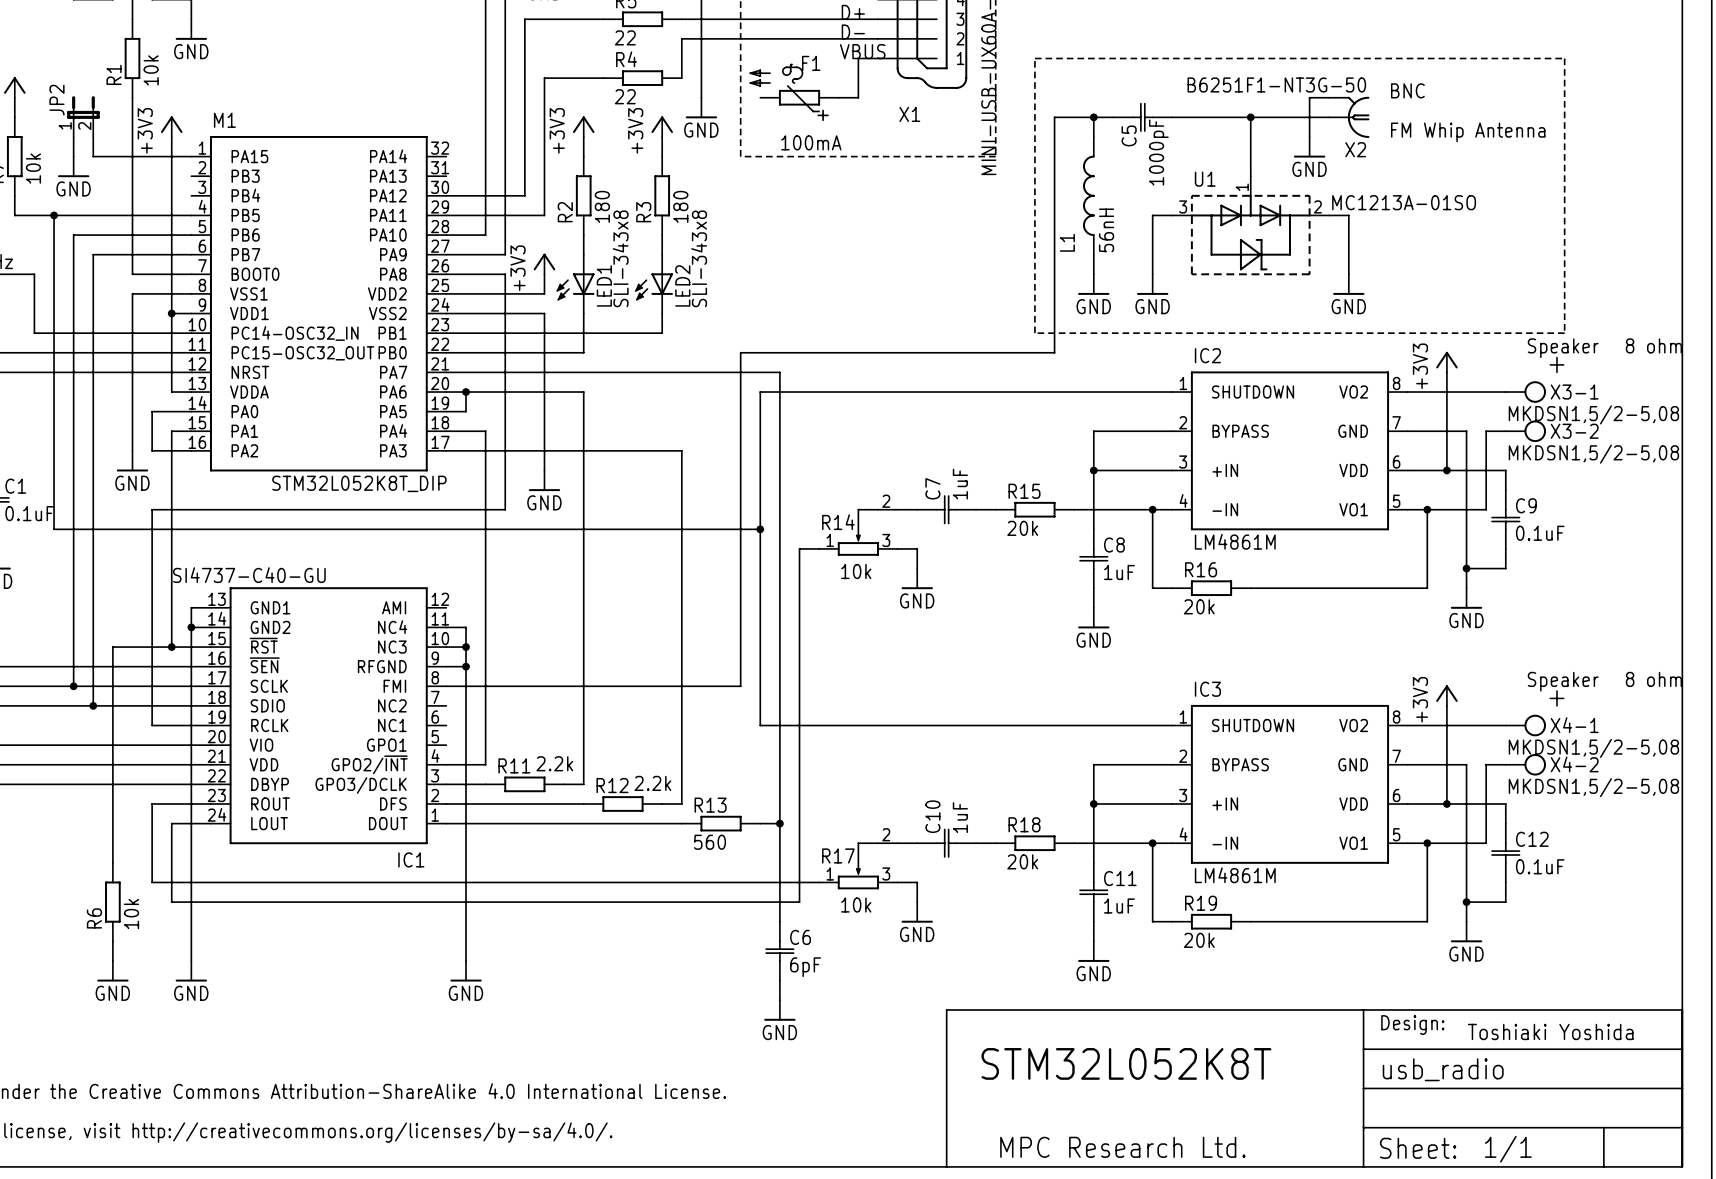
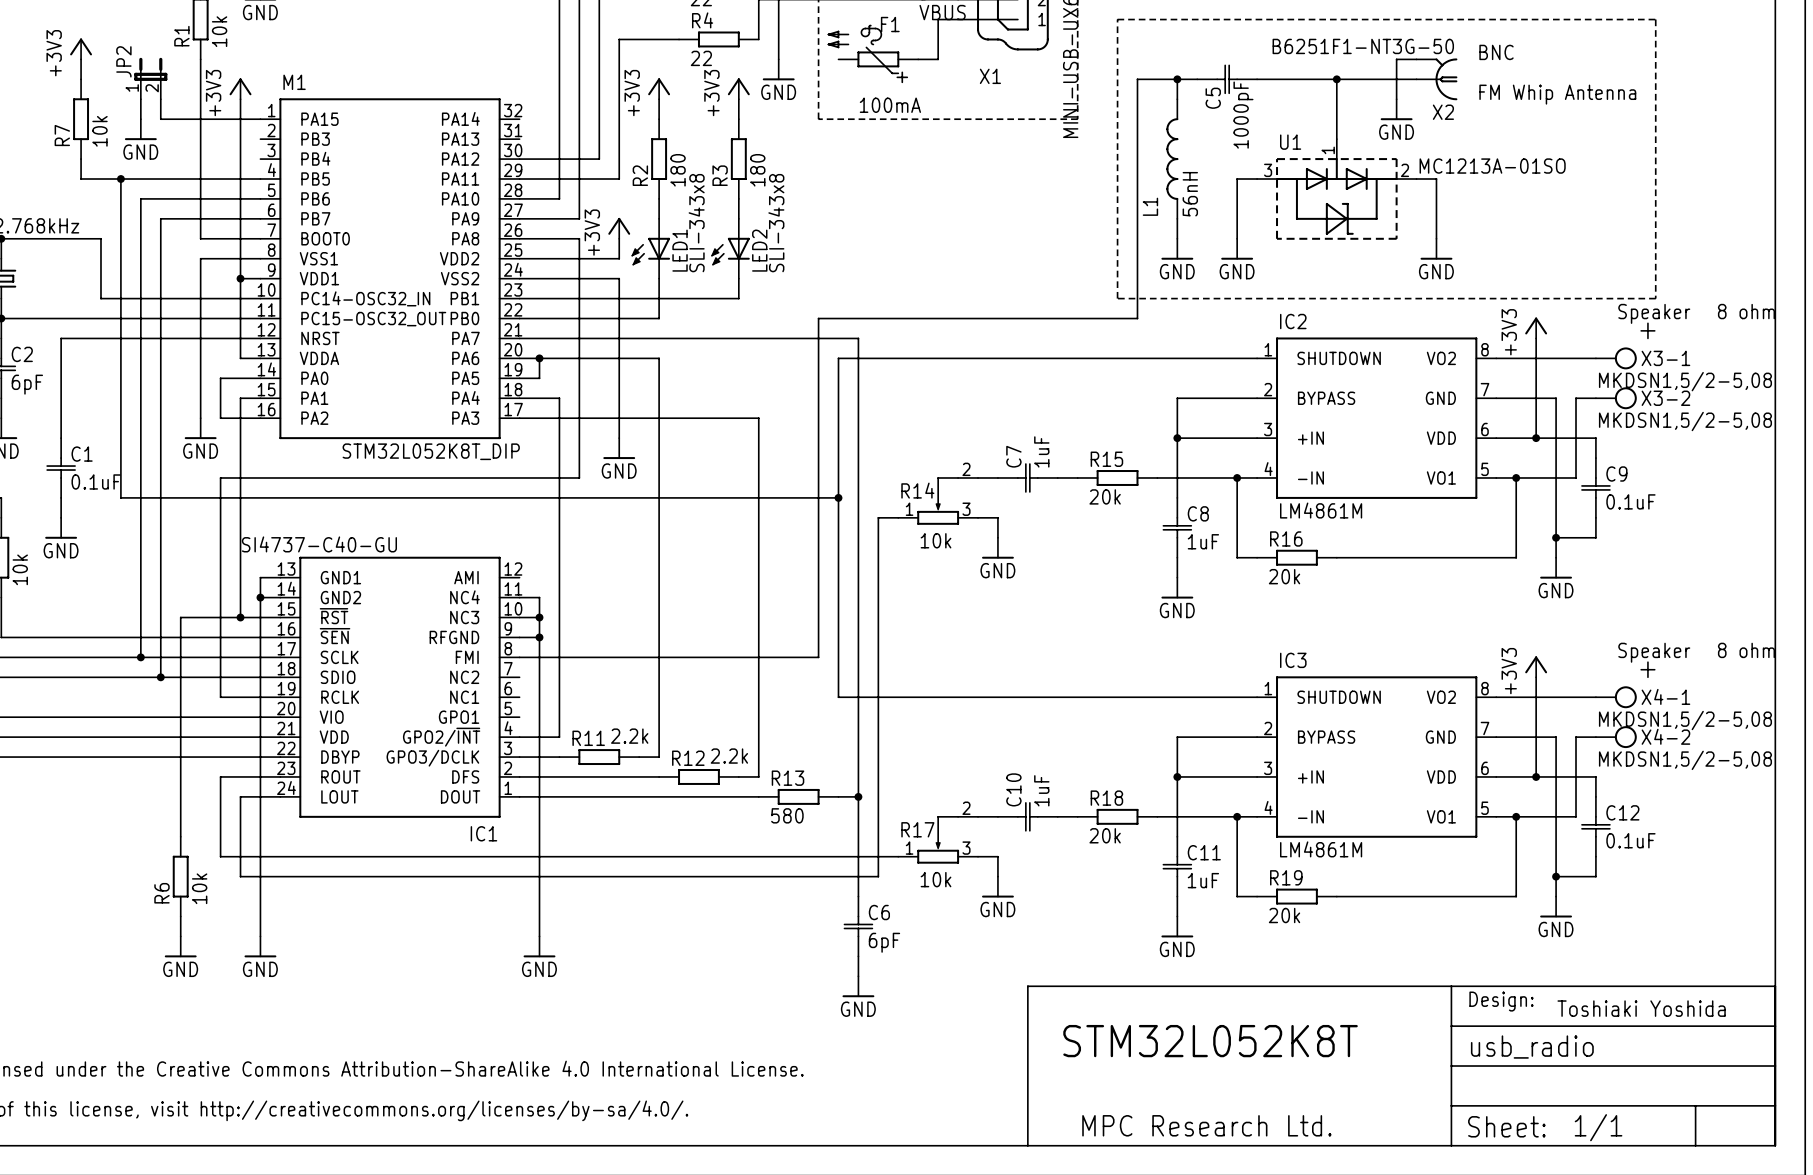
R13 value: 560 (710, 842) -> 580 (787, 815)

